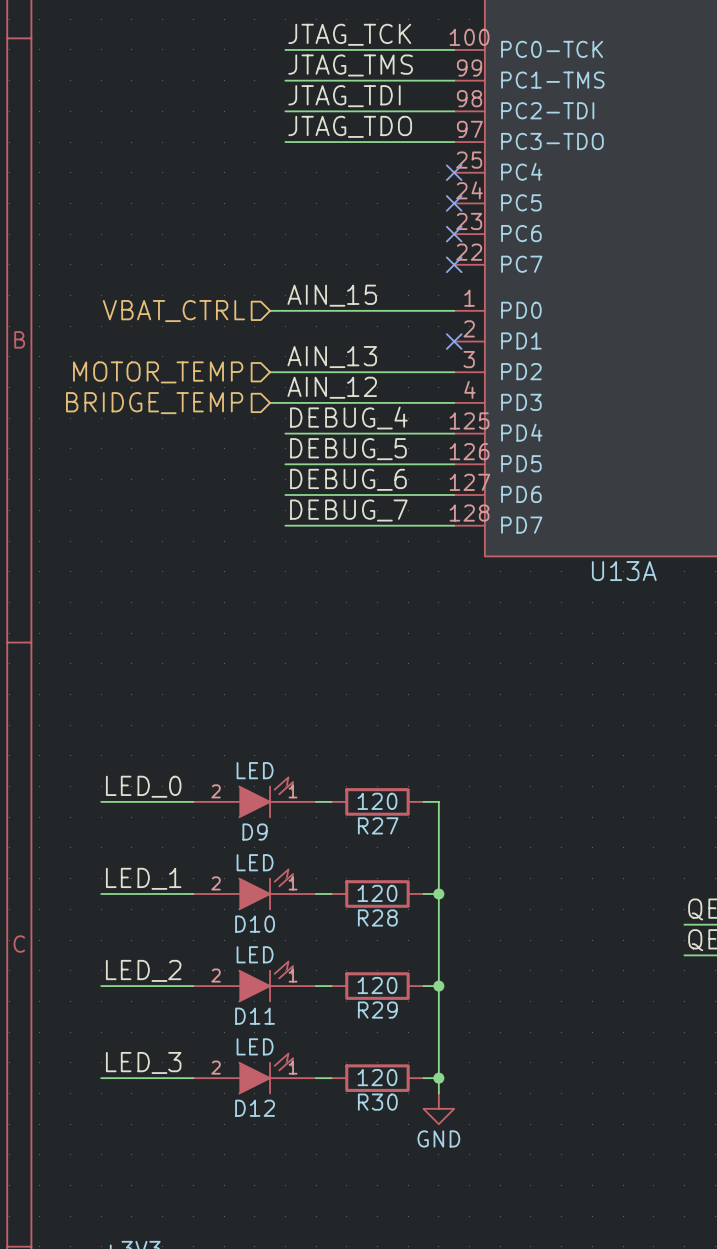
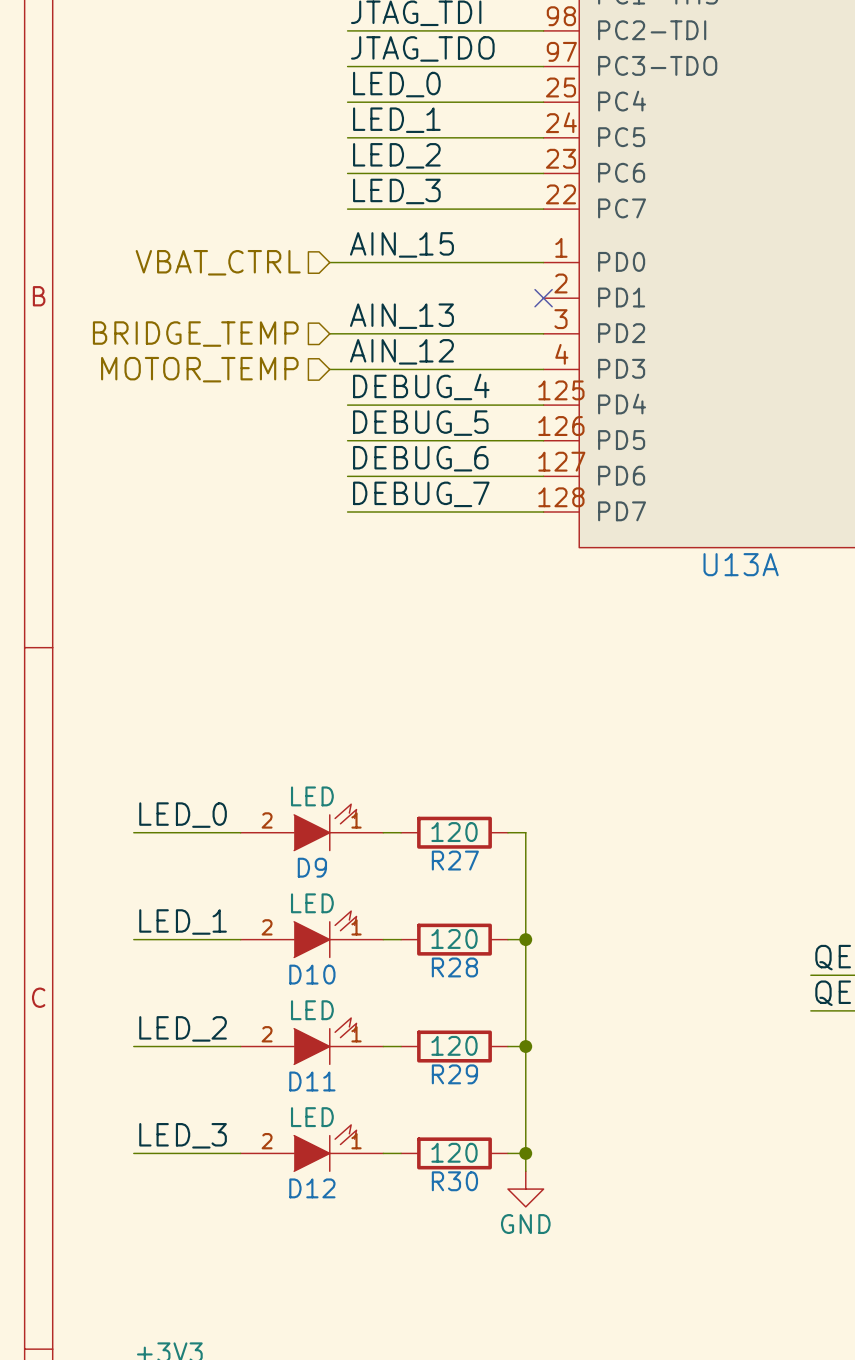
label: none -> LED_0 (396, 84)
wire: none -> (347, 102) (543, 102)
no-connect mark: (454, 172) -> none
label: none -> LED_1 (396, 120)
wire: none -> (347, 137) (543, 137)
no-connect mark: (454, 203) -> none
label: none -> LED_2 (396, 155)
wire: none -> (347, 173) (543, 173)
no-connect mark: (454, 234) -> none
label: none -> LED_3 (396, 191)
wire: none -> (347, 209) (543, 209)
no-connect mark: (454, 264) -> none
hierarchical label: MOTOR_TEMP (158, 372) -> BRIDGE_TEMP (195, 334)
hierarchical label: BRIDGE_TEMP (154, 403) -> MOTOR_TEMP (199, 369)

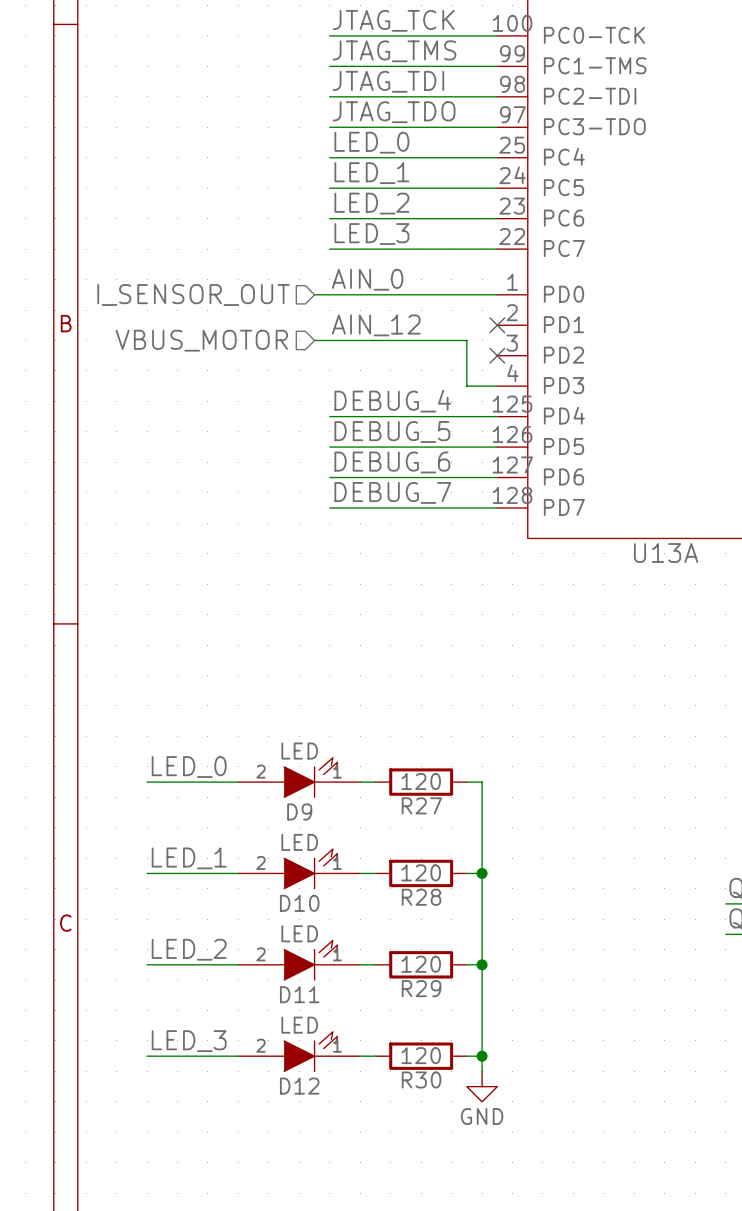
label: AIN_15 (401, 244) -> AIN_0 (367, 279)
hierarchical label: VBAT_CTRL (218, 262) -> I_SENSOR_OUT (193, 294)
hierarchical label: none -> VBUS_MOTOR (201, 340)
label: AIN_13 (401, 316) -> none
wire: (329, 333) (543, 333) -> none
no-connect mark: none -> (497, 355)
hierarchical label: BRIDGE_TEMP (195, 334) -> none
label position: AIN_12 (401, 351) -> AIN_12 (376, 325)
hierarchical label: MOTOR_TEMP (199, 369) -> none
wire: (329, 369) (507, 369) -> (314, 340) (466, 340) (466, 386)

